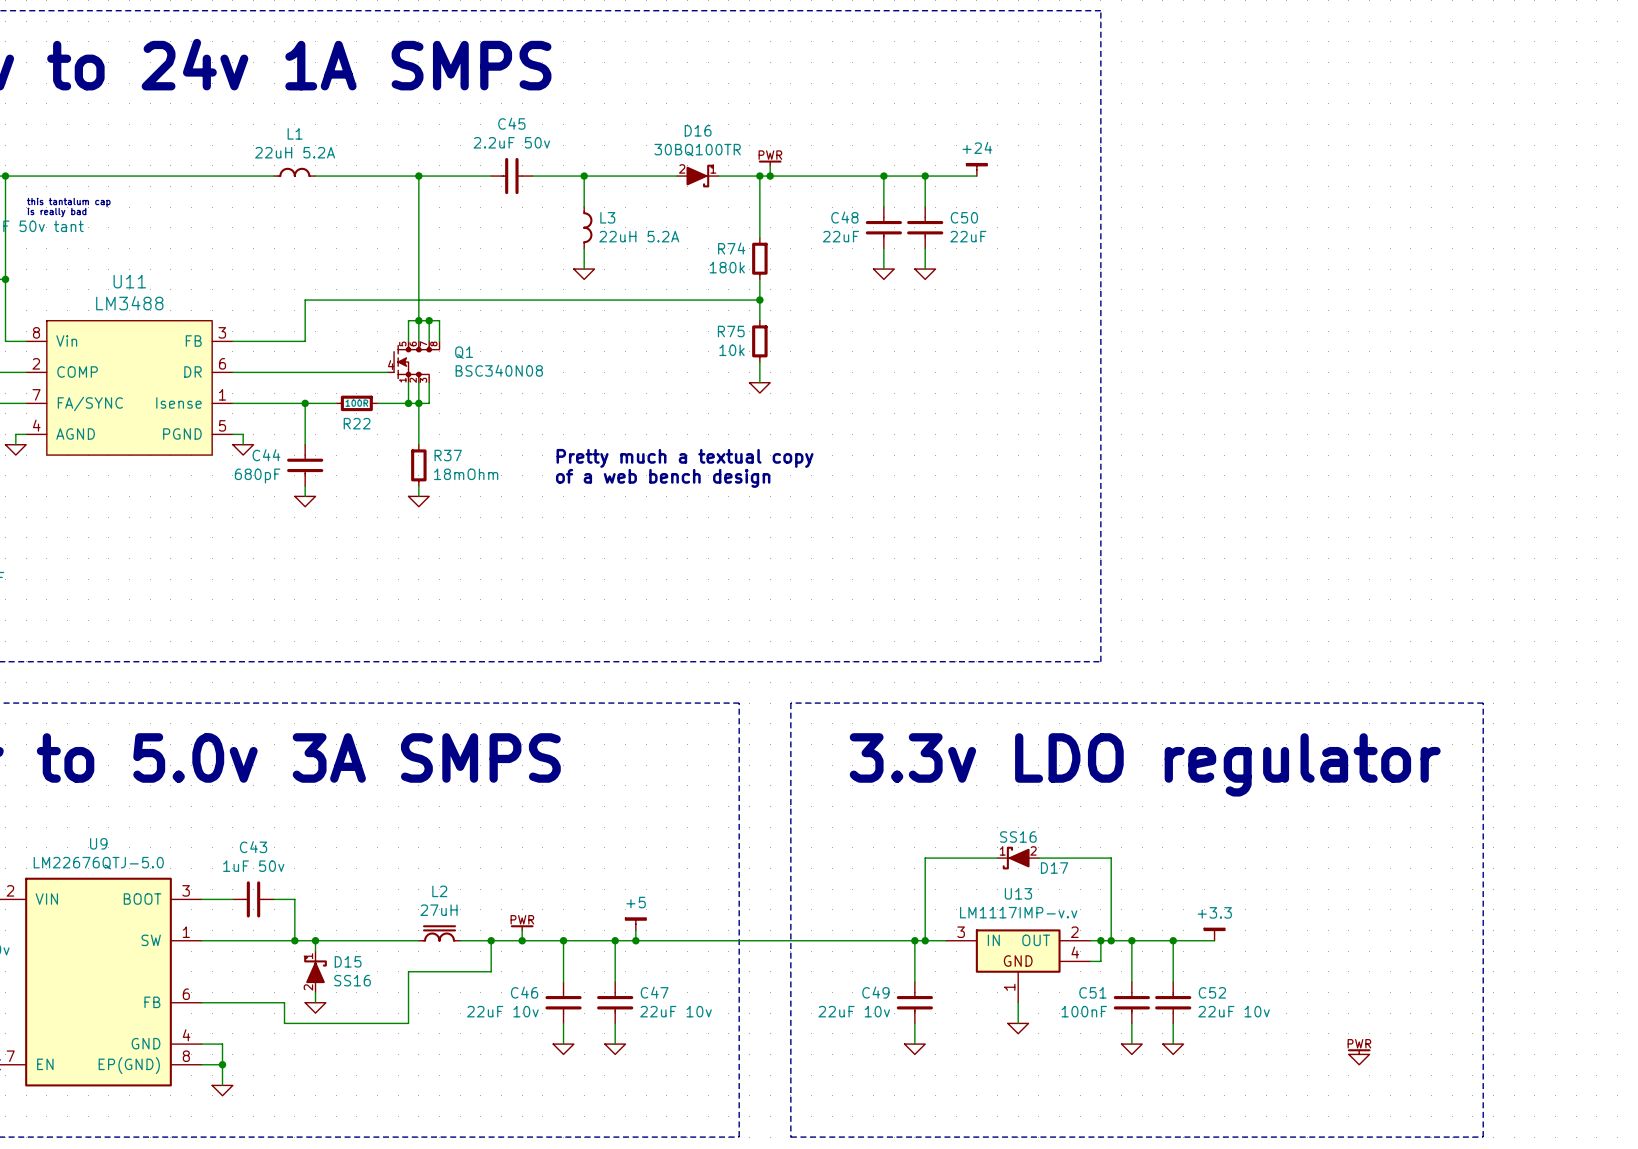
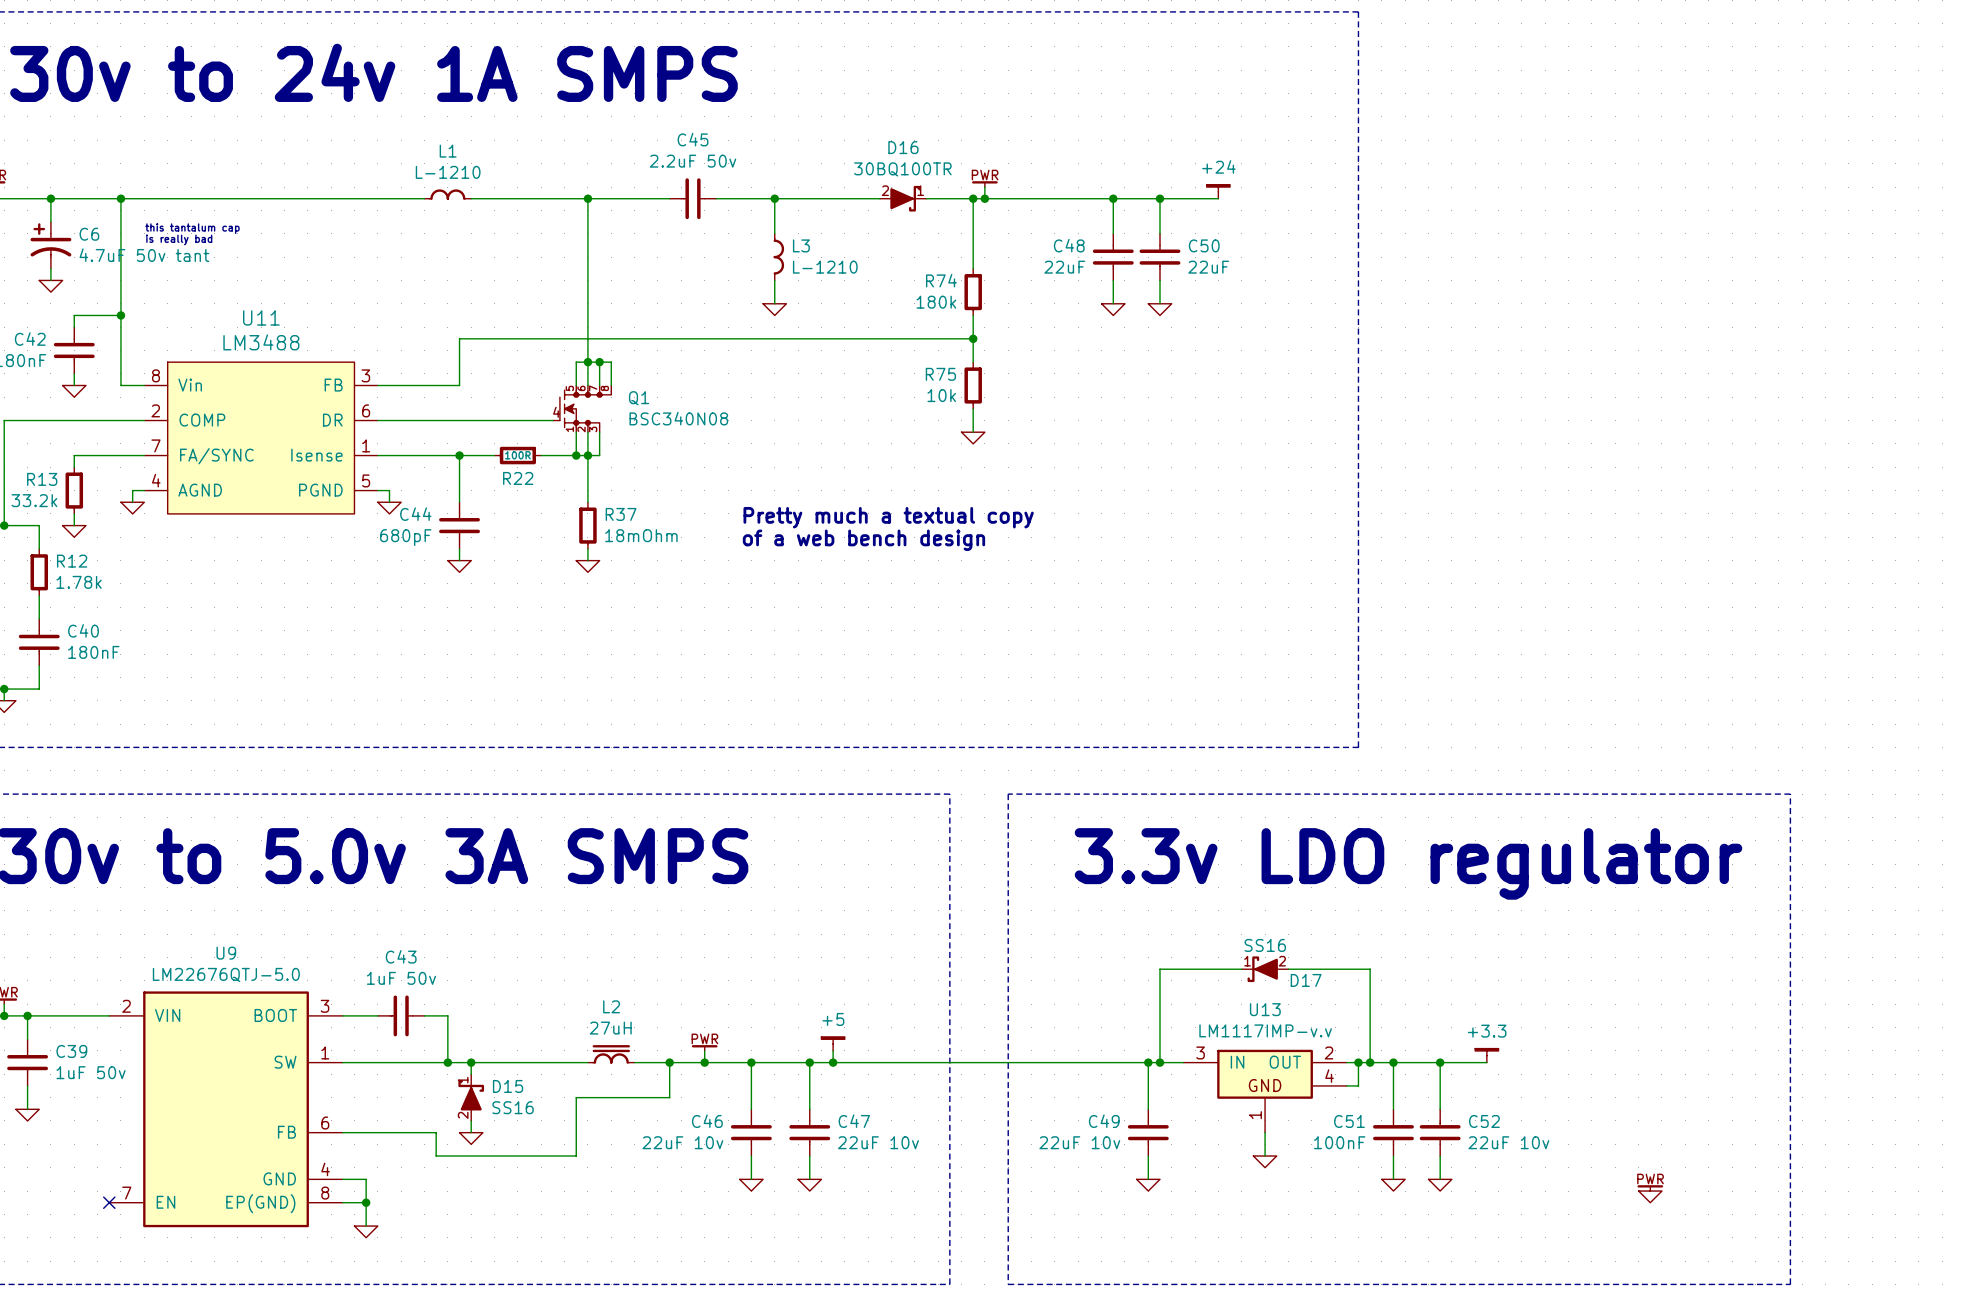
L1 value: 22uH 5.2A (295, 152) -> L-1210 (448, 172)
L3 value: 22uH 5.2A (639, 236) -> L-1210 (825, 267)

